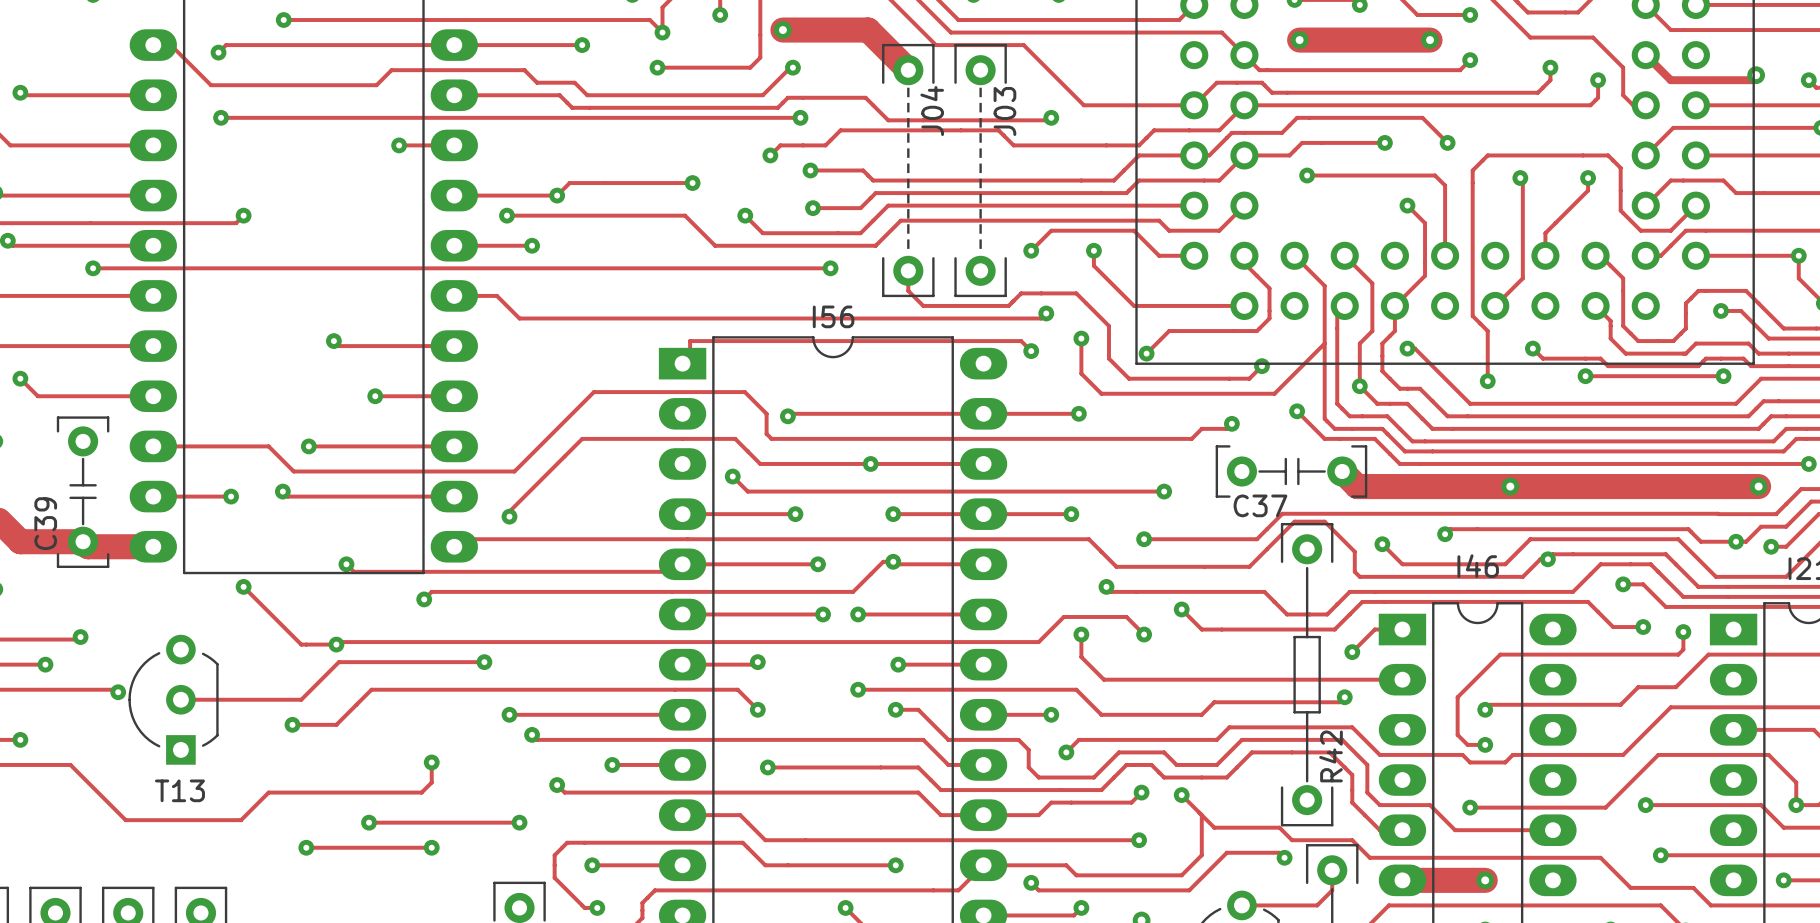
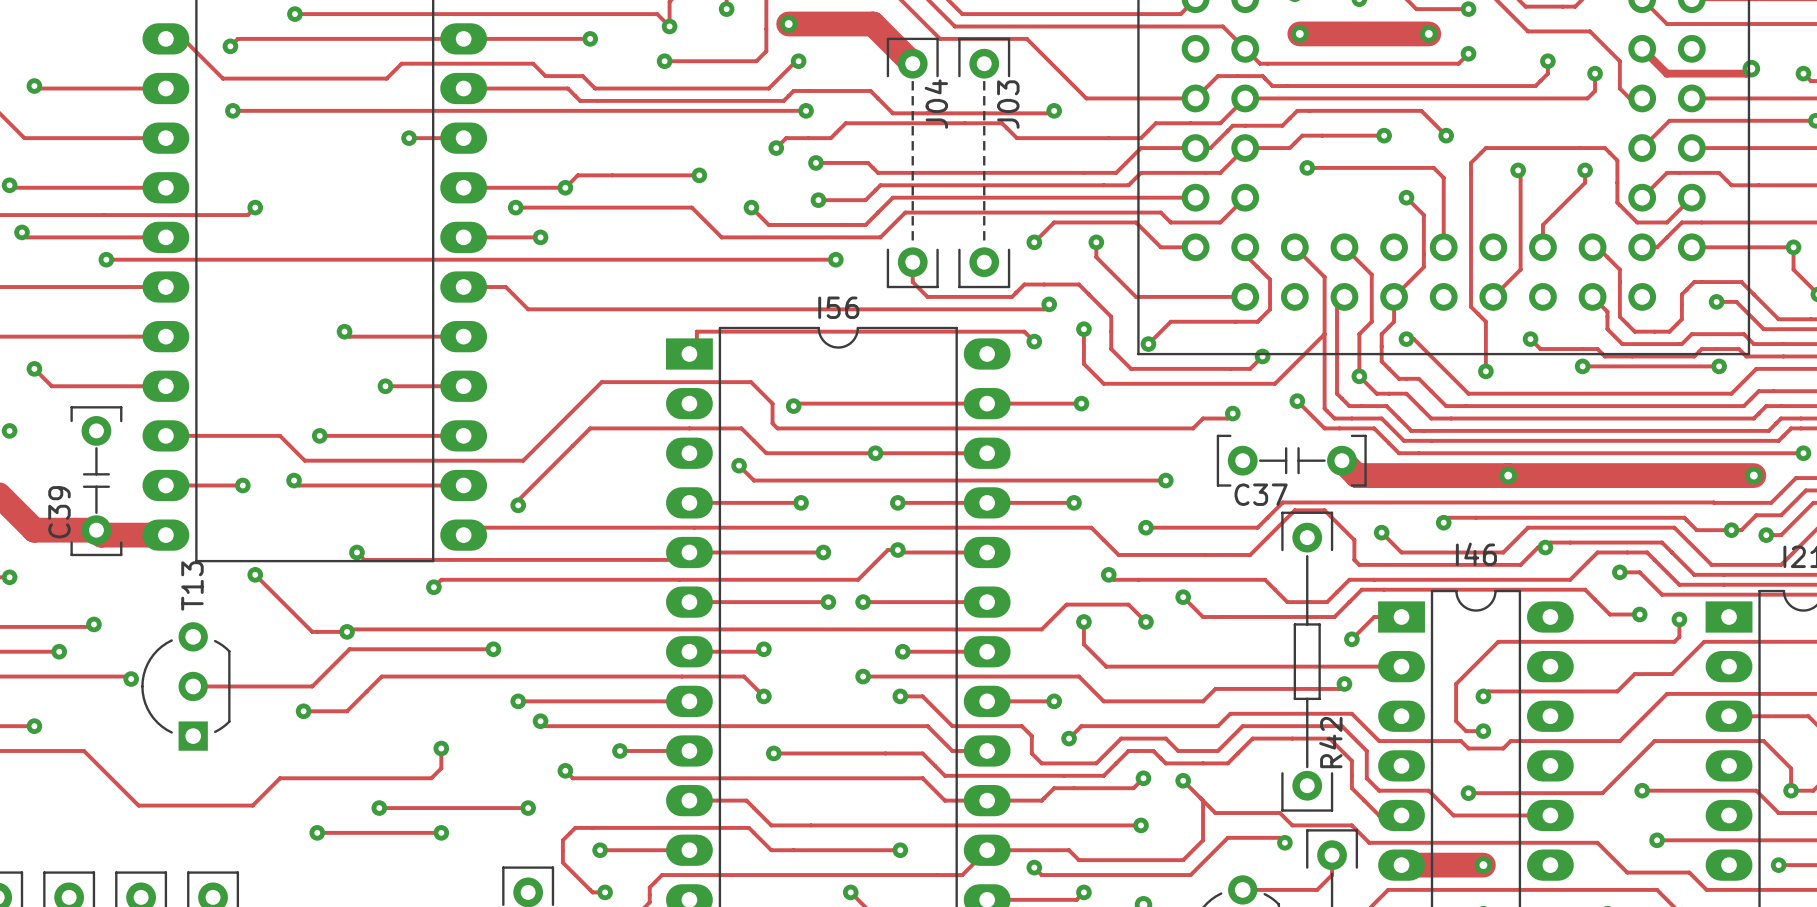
T13 name rotation: 0° (179, 790) -> 90° counterclockwise (192, 585)
T13 name position: T13 (179, 790) -> T13 (192, 585)

